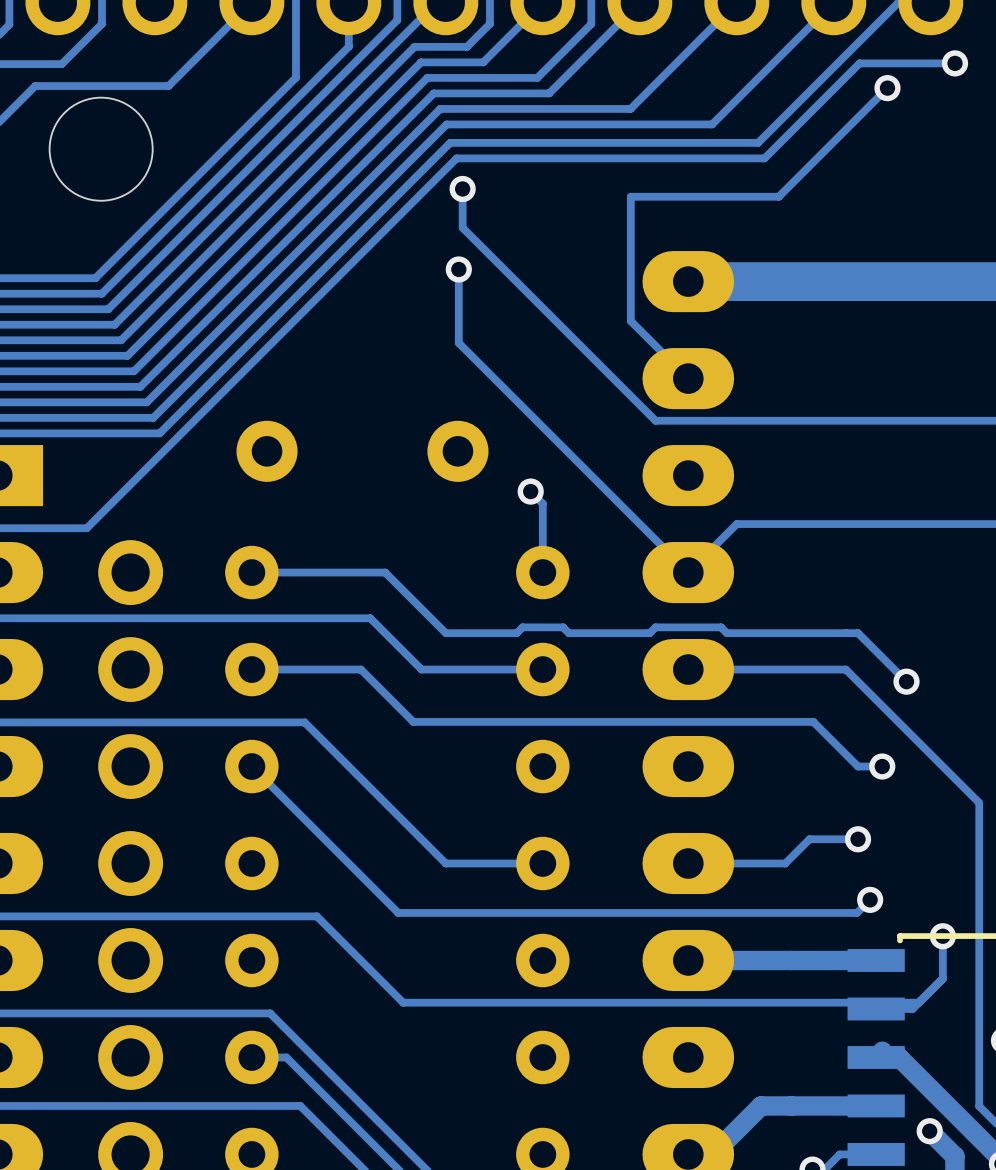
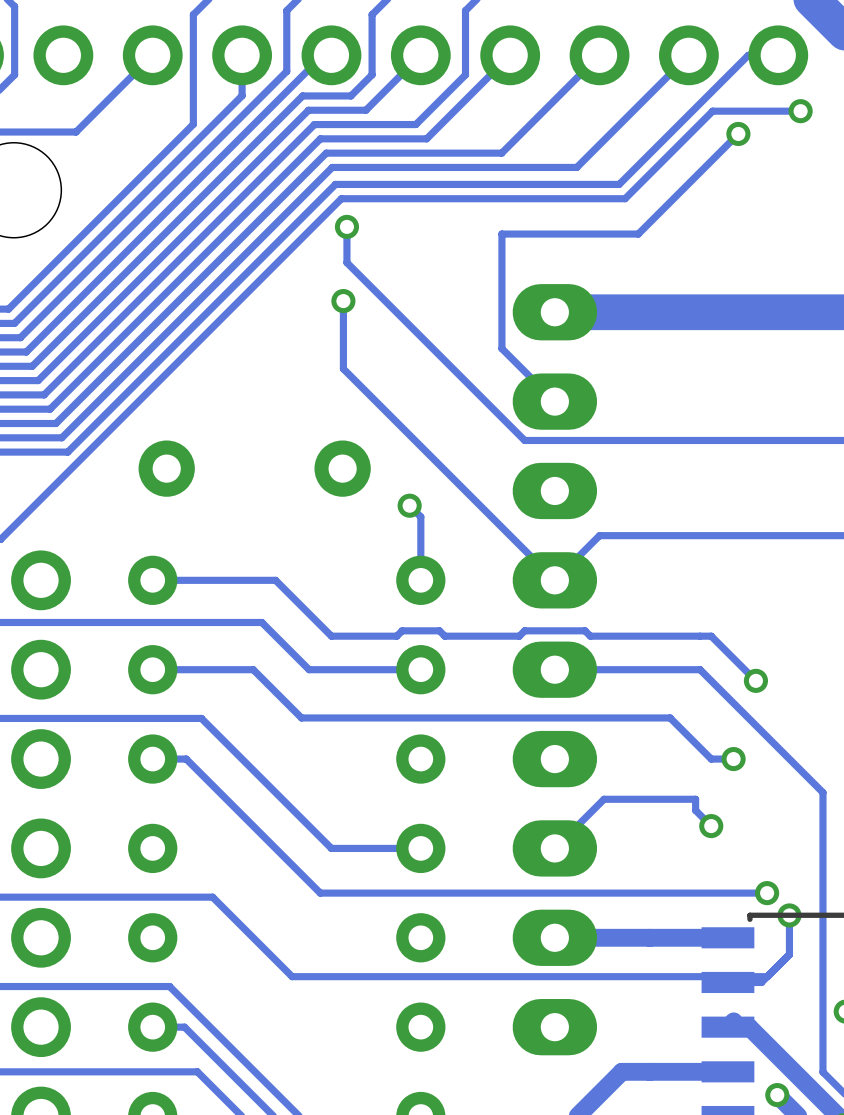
track: (251, 766) (398, 912) (857, 912) (870, 899) -> (152, 759) (186, 759) (320, 893) (767, 893)
track: (858, 839) (809, 839) (785, 863) (688, 863) -> (711, 826) (695, 810) (695, 799) (604, 799) (554, 848)
via position: (870, 899) -> (767, 893)

